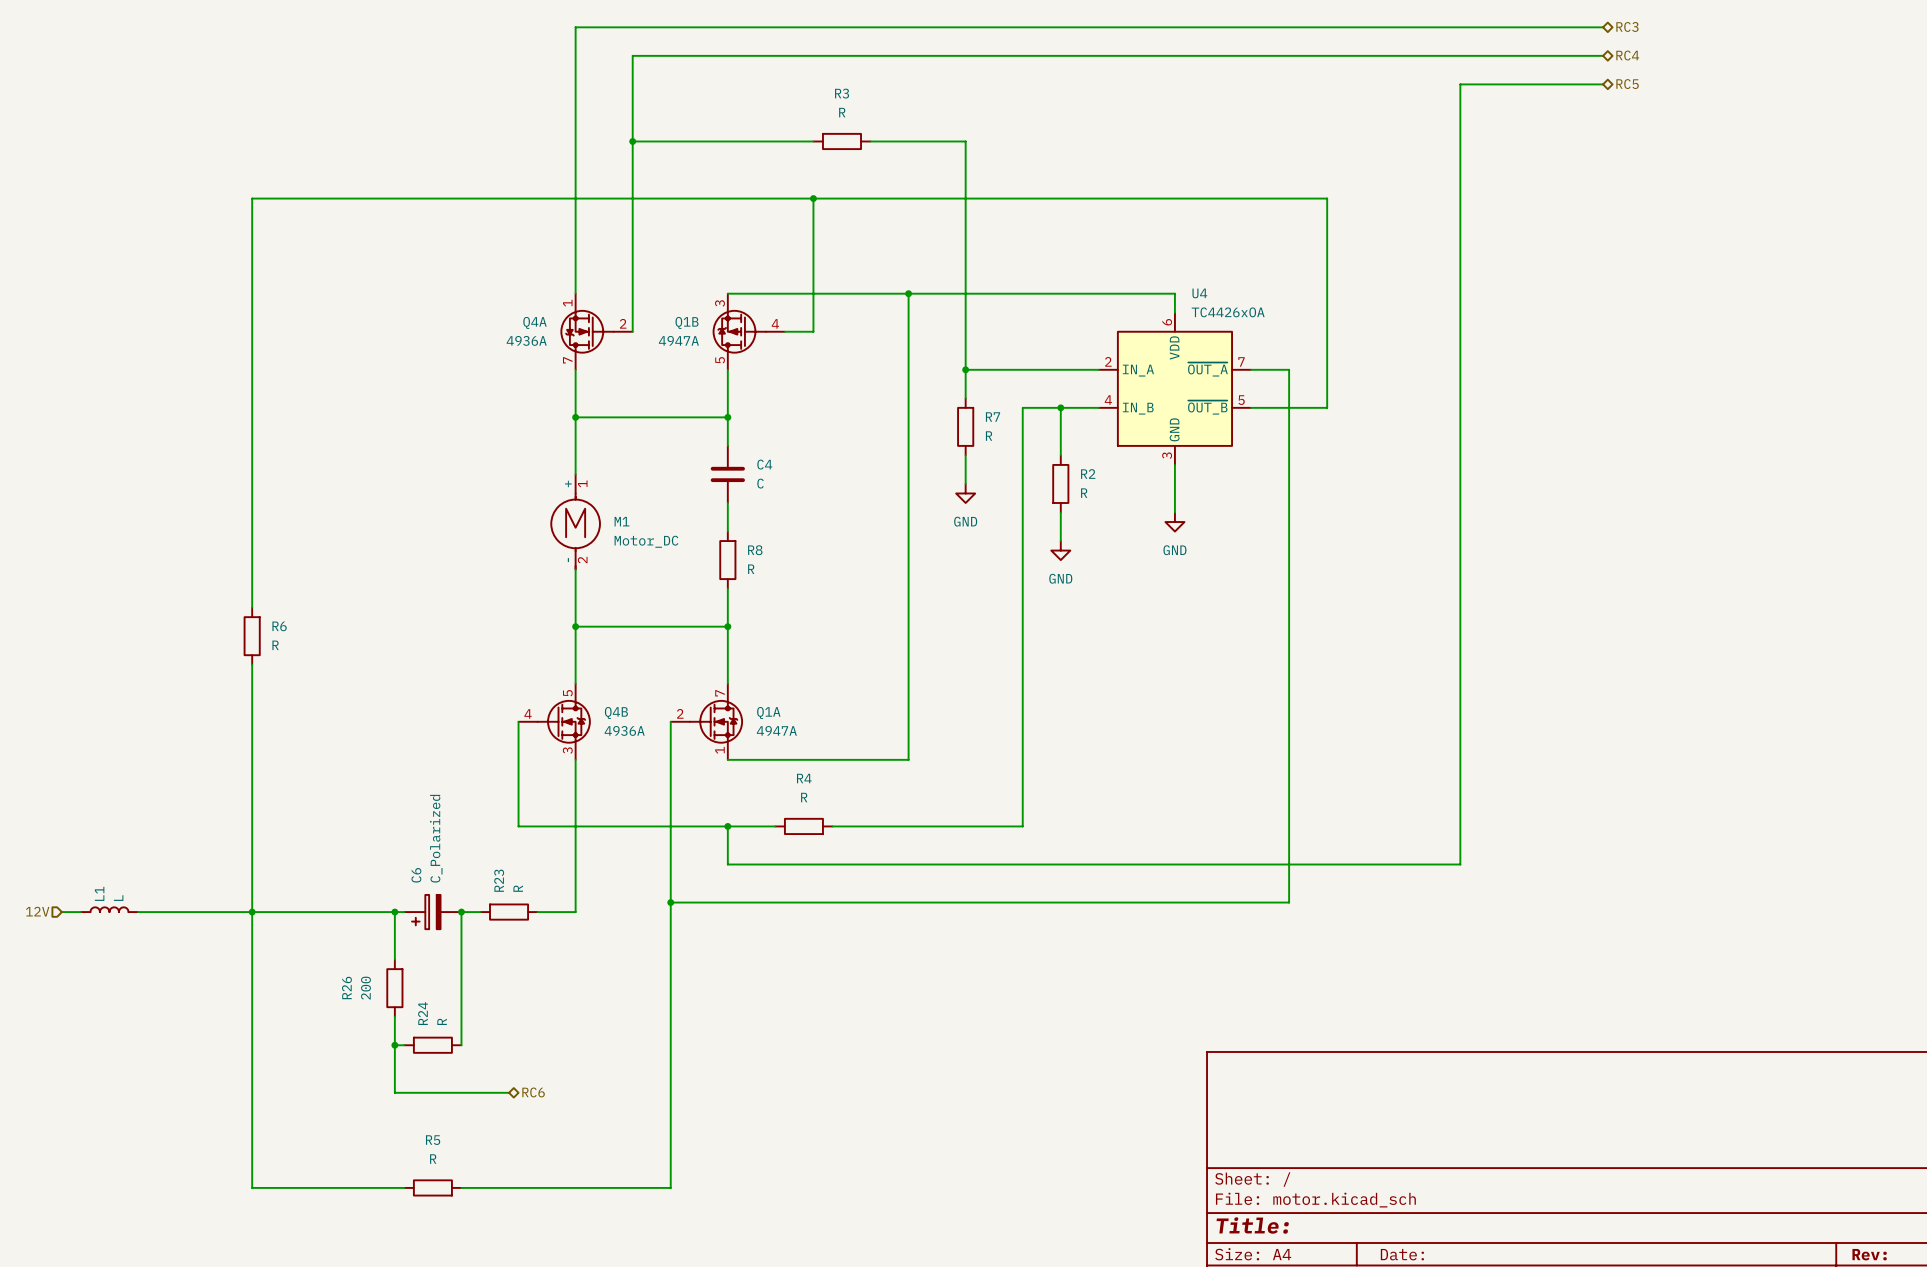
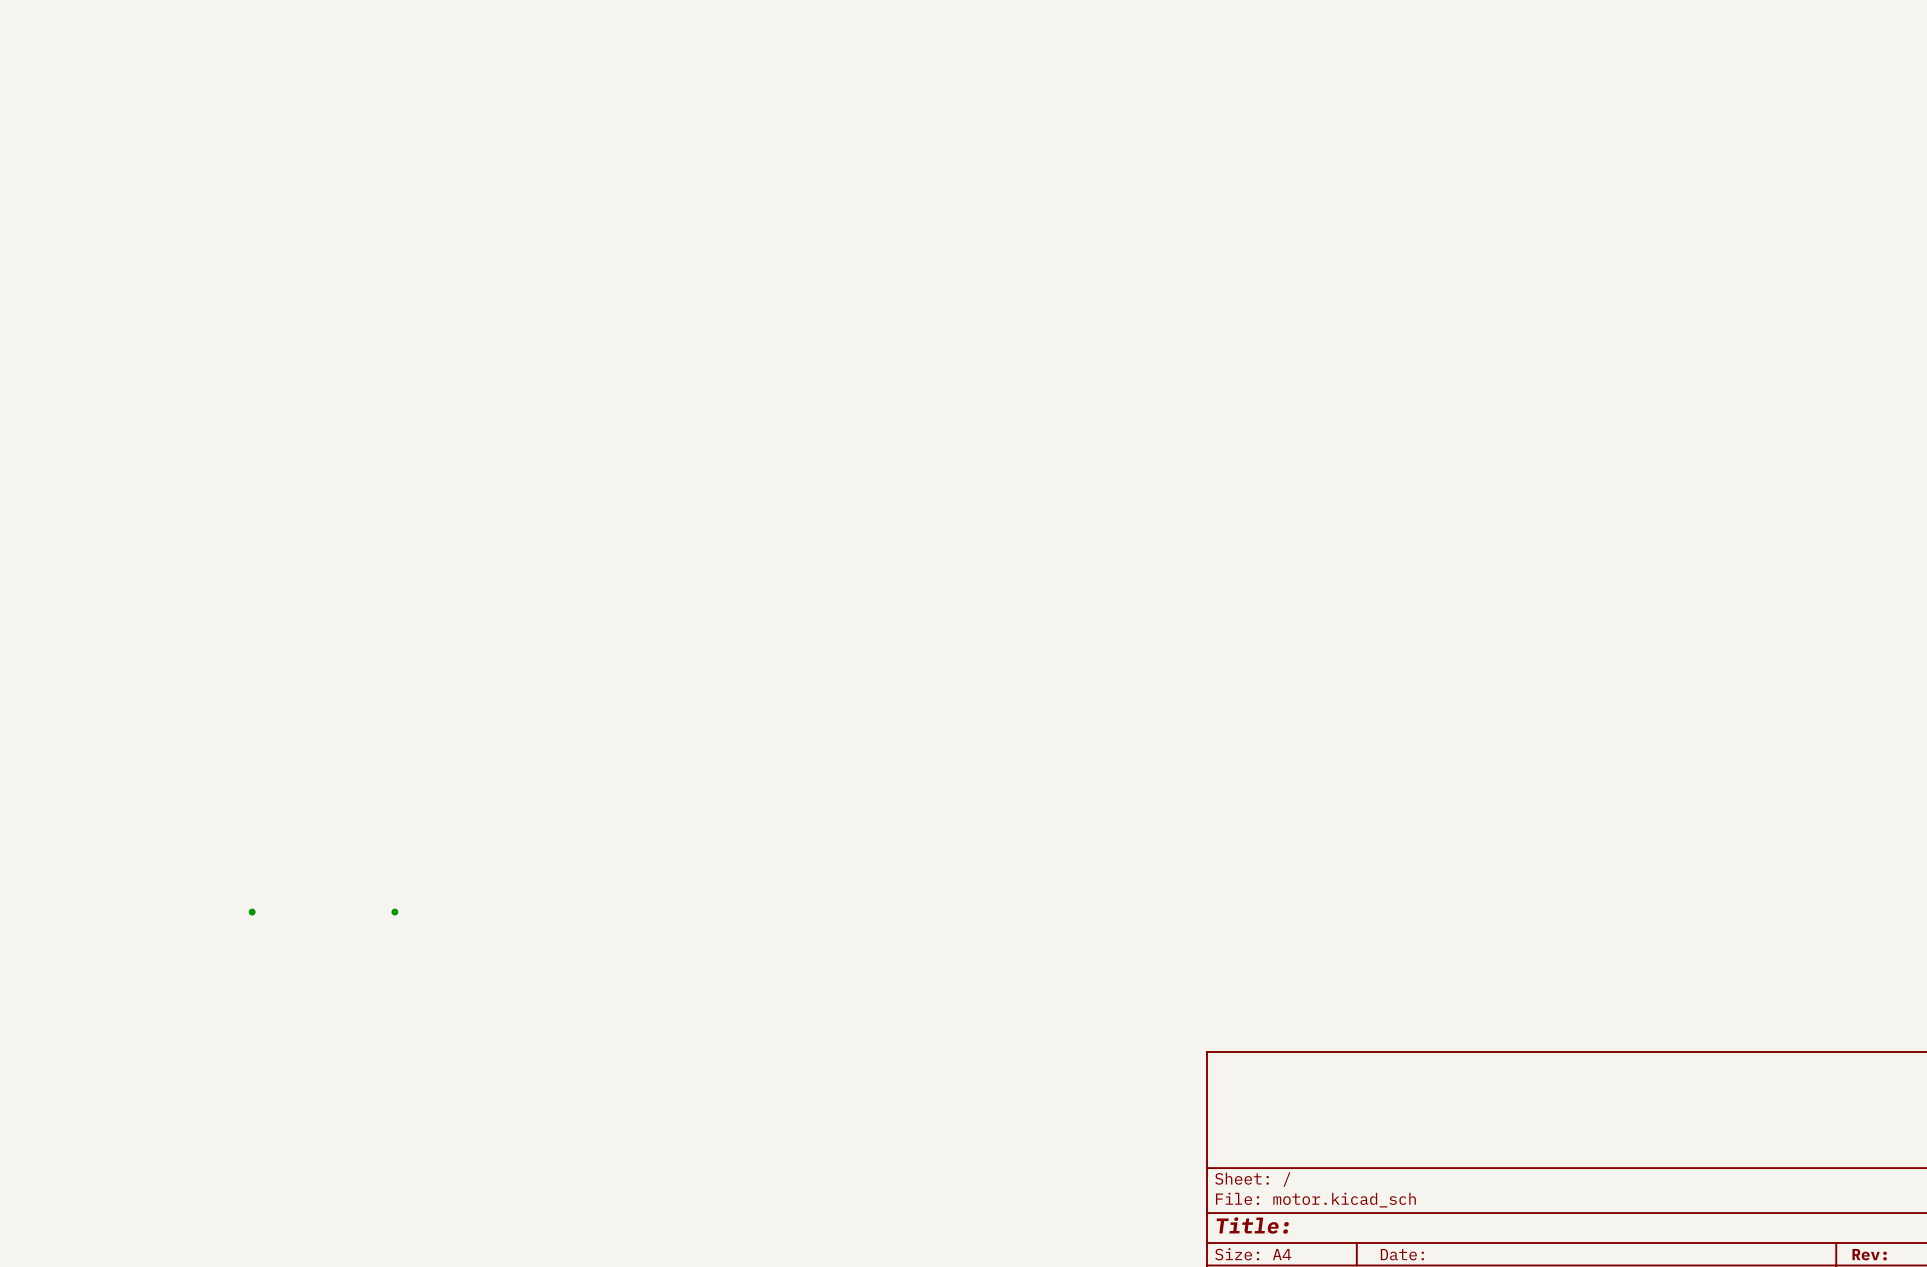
hierarchical label: RC3 (1627, 26) -> none
wire: (1603, 27) (575, 27) (575, 293) -> none
wire: (1603, 55) (632, 55) (632, 331) -> none
hierarchical label: RC4 (1627, 55) -> none
wire: (1603, 84) (1460, 84) (1460, 864) (727, 864) (727, 826) -> none
hierarchical label: RC5 (1627, 84) -> none
wire: (632, 141) (813, 141) -> none
junction: (632, 141) -> none
R3: R (841, 141) -> none
wire: (870, 141) (965, 141) (965, 398) -> none
wire: (813, 198) (813, 331) (784, 331) -> none
junction: (813, 198) -> none
wire: (727, 293) (1174, 293) (1174, 312) -> none
wire: (908, 293) (908, 759) (727, 759) -> none
junction: (908, 293) -> none
Q4A: 4936A (596, 331) -> none
Q1B: 4947A (748, 331) -> none
wire: (575, 369) (575, 474) -> none
wire: (727, 369) (727, 445) -> none
wire: (965, 369) (1098, 369) -> none
junction: (965, 369) -> none
wire: (1251, 369) (1289, 369) (1289, 902) (670, 902) -> none
U4: TC4426xOA (1174, 388) -> none
wire: (1060, 407) (1060, 455) -> none
junction: (1060, 407) -> none
wire: (1098, 407) (1022, 407) (1022, 826) (832, 826) -> none
wire: (1251, 407) (1327, 407) (1327, 198) (252, 198) (252, 607) -> none
wire: (575, 417) (727, 417) -> none
junction: (575, 417) -> none
junction: (727, 417) -> none
R7: R (965, 426) -> none
wire: (965, 455) (965, 483) -> none
wire: (1174, 464) (1174, 512) -> none
C4: C (727, 474) -> none
R2: R (1060, 483) -> none
power symbol: GND (965, 493) -> none
wire: (727, 502) (727, 531) -> none
wire: (1060, 512) (1060, 541) -> none
M1: Motor_DC (575, 522) -> none
power symbol: GND (1174, 522) -> none
power symbol: GND (1060, 550) -> none
R8: R (727, 560) -> none
wire: (575, 569) (575, 683) -> none
wire: (727, 588) (727, 683) -> none
wire: (575, 626) (727, 626) -> none
junction: (575, 626) -> none
junction: (727, 626) -> none
R6: R (252, 636) -> none
wire: (252, 664) (252, 1187) (404, 1187) -> none
wire: (518, 721) (518, 826) (775, 826) -> none
Q4B: 4936A (554, 721) -> none
wire: (670, 721) (670, 1187) (461, 1187) -> none
Q1A: 4947A (706, 721) -> none
wire: (575, 759) (575, 912) (537, 912) -> none
junction: (727, 826) -> none
R4: R (803, 826) -> none
junction: (670, 902) -> none
L1: L (109, 909) -> none
hierarchical label: 12V (37, 911) -> none
wire: (61, 912) (80, 912) -> none
wire: (138, 912) (404, 912) -> none
wire: (394, 912) (394, 959) -> none
C6: C_Polarized (432, 912) -> none
junction: (461, 912) -> none
wire: (480, 912) (461, 912) (461, 1045) -> none
R23: R (509, 912) -> none
R26: 200 (394, 988) -> none
wire: (394, 1016) (394, 1092) (509, 1092) -> none
wire: (394, 1045) (404, 1045) -> none
junction: (394, 1045) -> none
R24: R (432, 1045) -> none
hierarchical label: RC6 (533, 1092) -> none
R5: R (432, 1187) -> none

